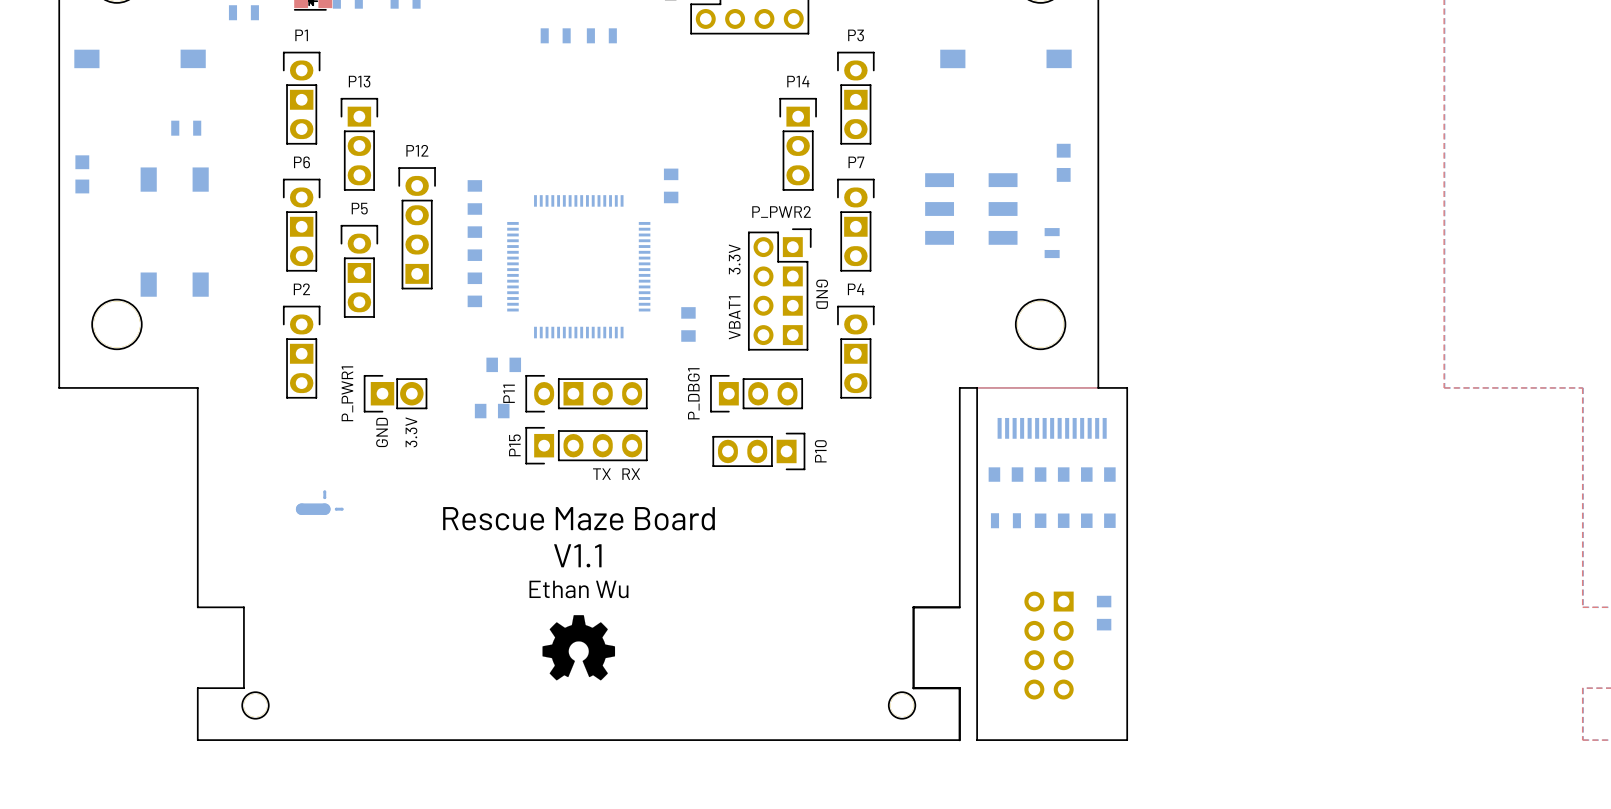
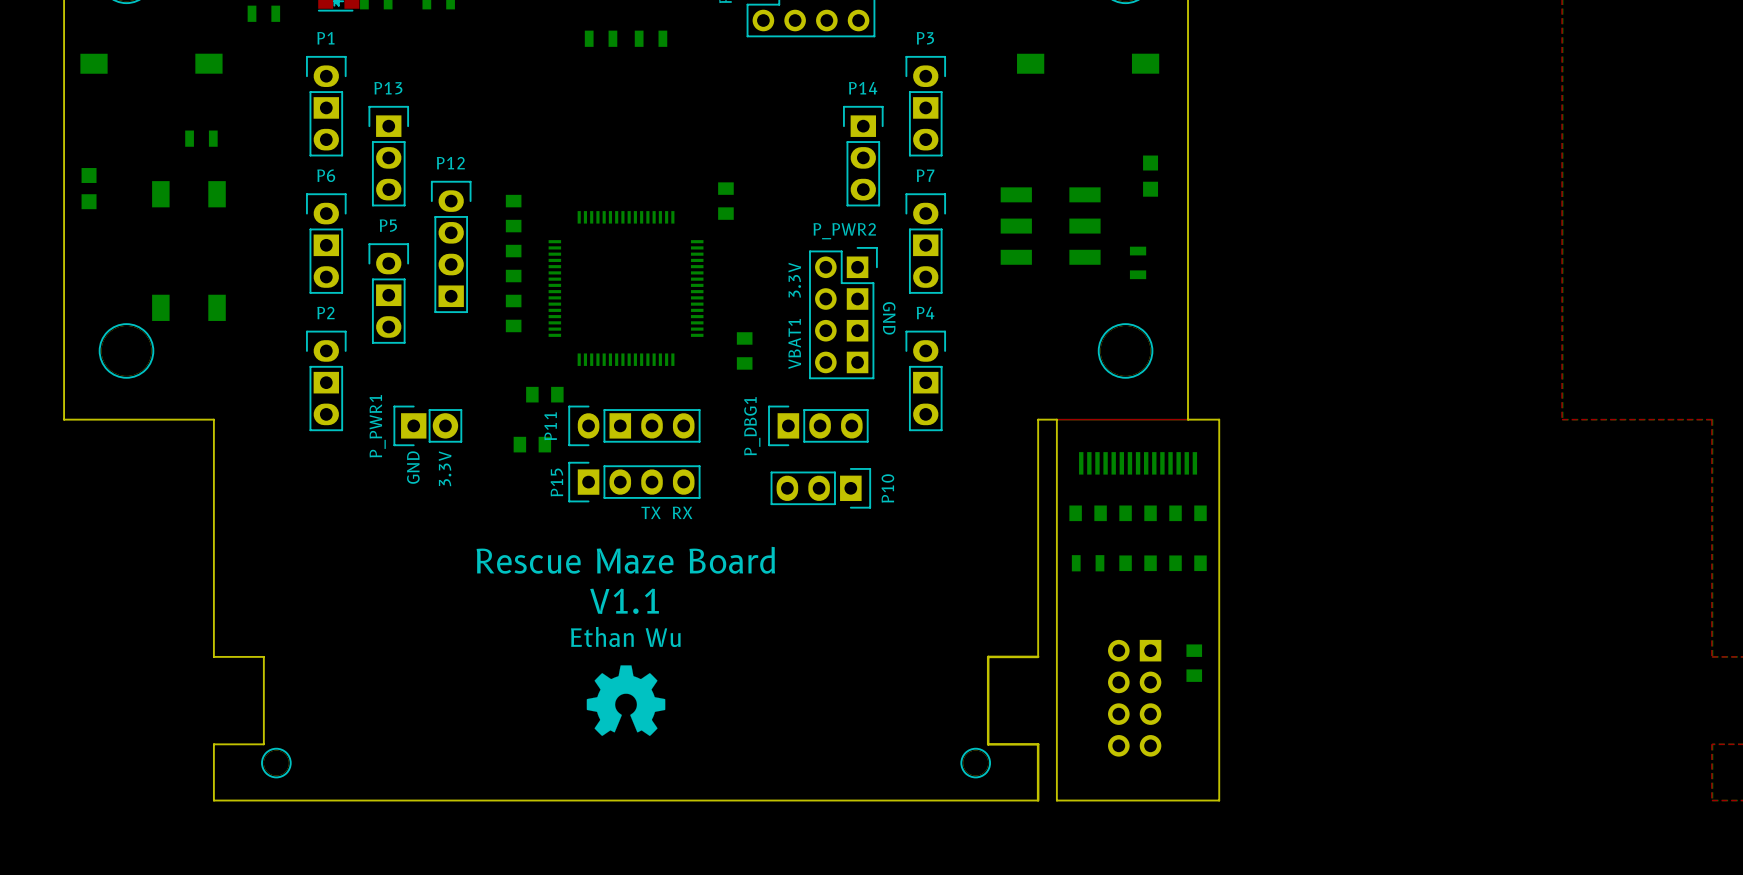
part: (324, 494) -> none
part: (313, 509) -> none
part: (339, 509) -> none

